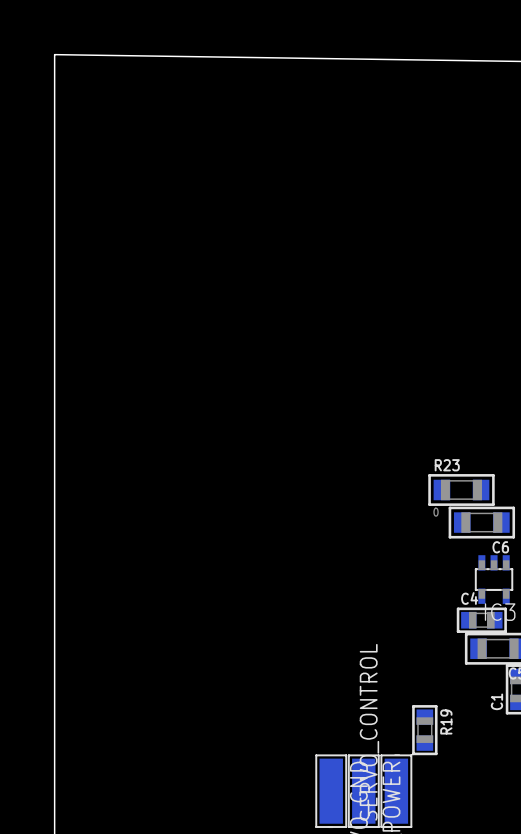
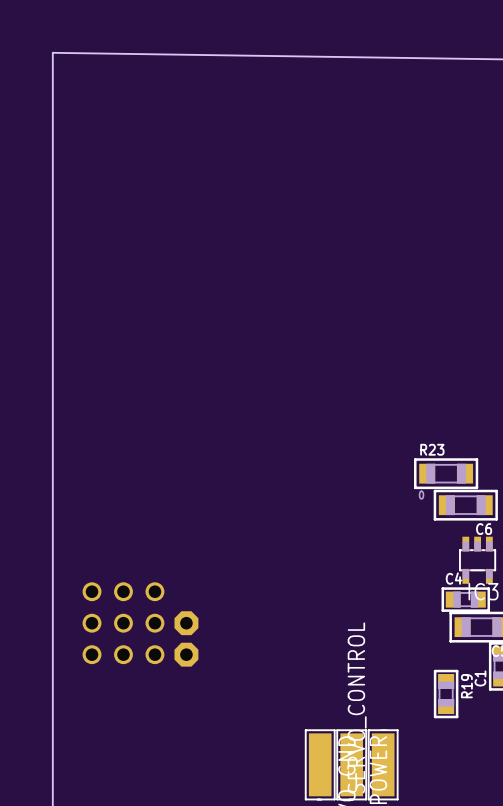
part: none -> (92, 623)
part: none -> (123, 623)
part: none -> (154, 623)
part: none -> (186, 623)
part: none -> (186, 654)
R19 position: (424, 730) -> (446, 694)

